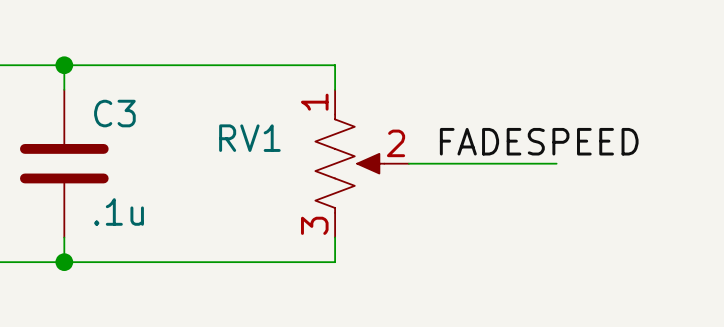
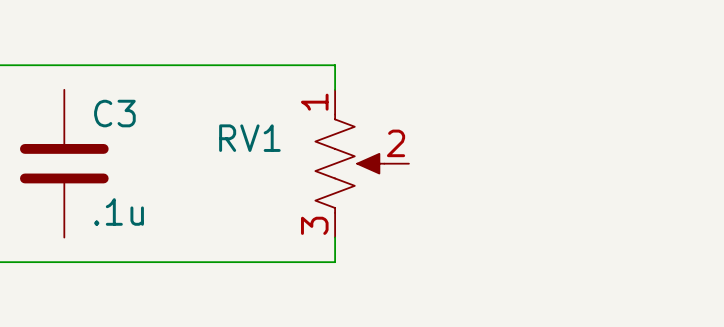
wire: (64, 65) (64, 89) -> none
junction: (64, 65) -> none
label: FADESPEED (539, 141) -> none
wire: (408, 163) (556, 163) -> none
wire: (64, 237) (64, 262) -> none
junction: (64, 262) -> none

